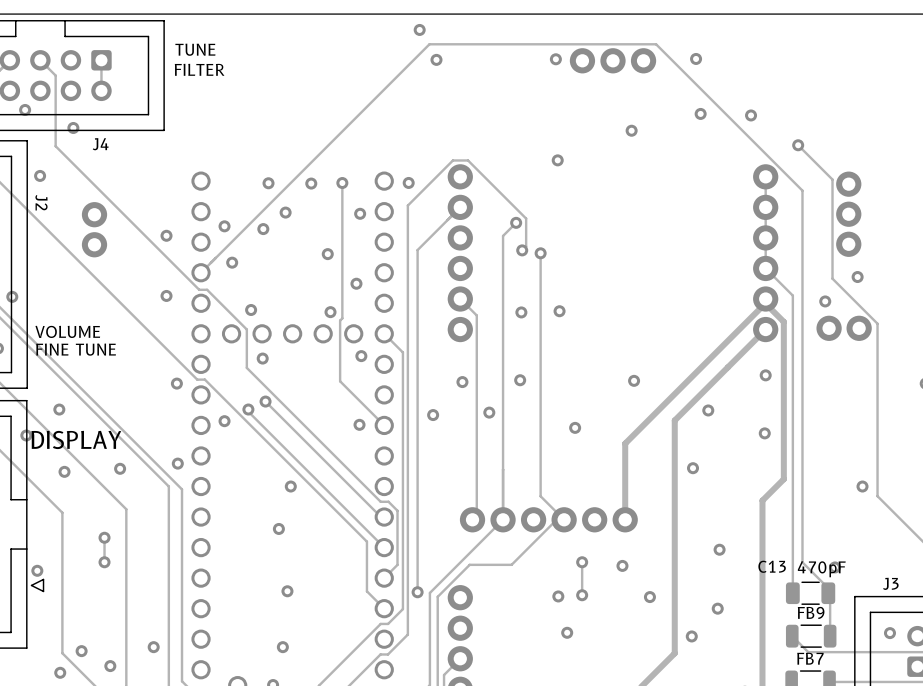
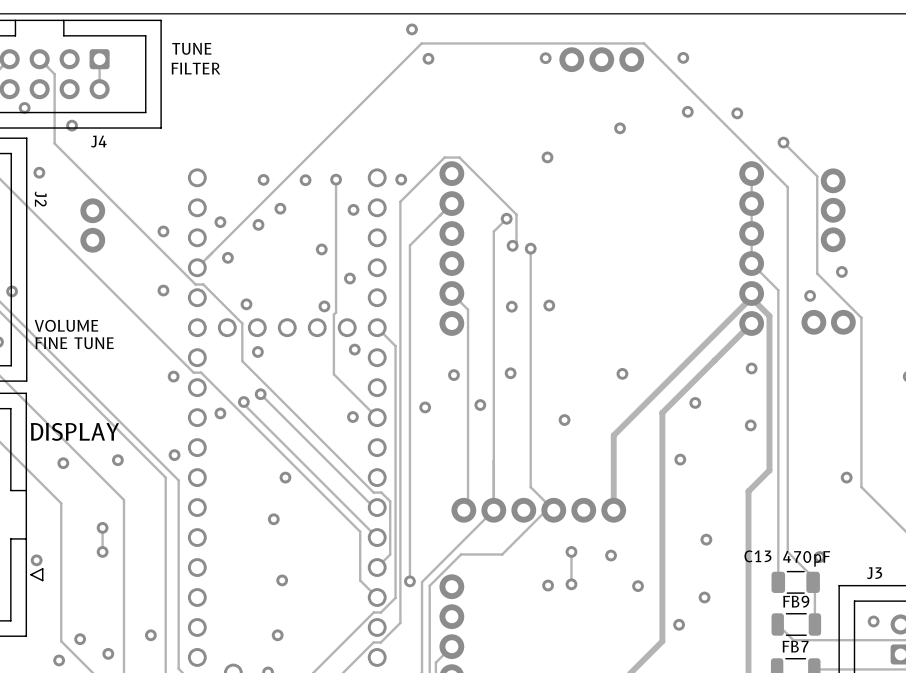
via: (59, 409) -> none
via: (26, 435) -> none
via: (567, 632) -> none

